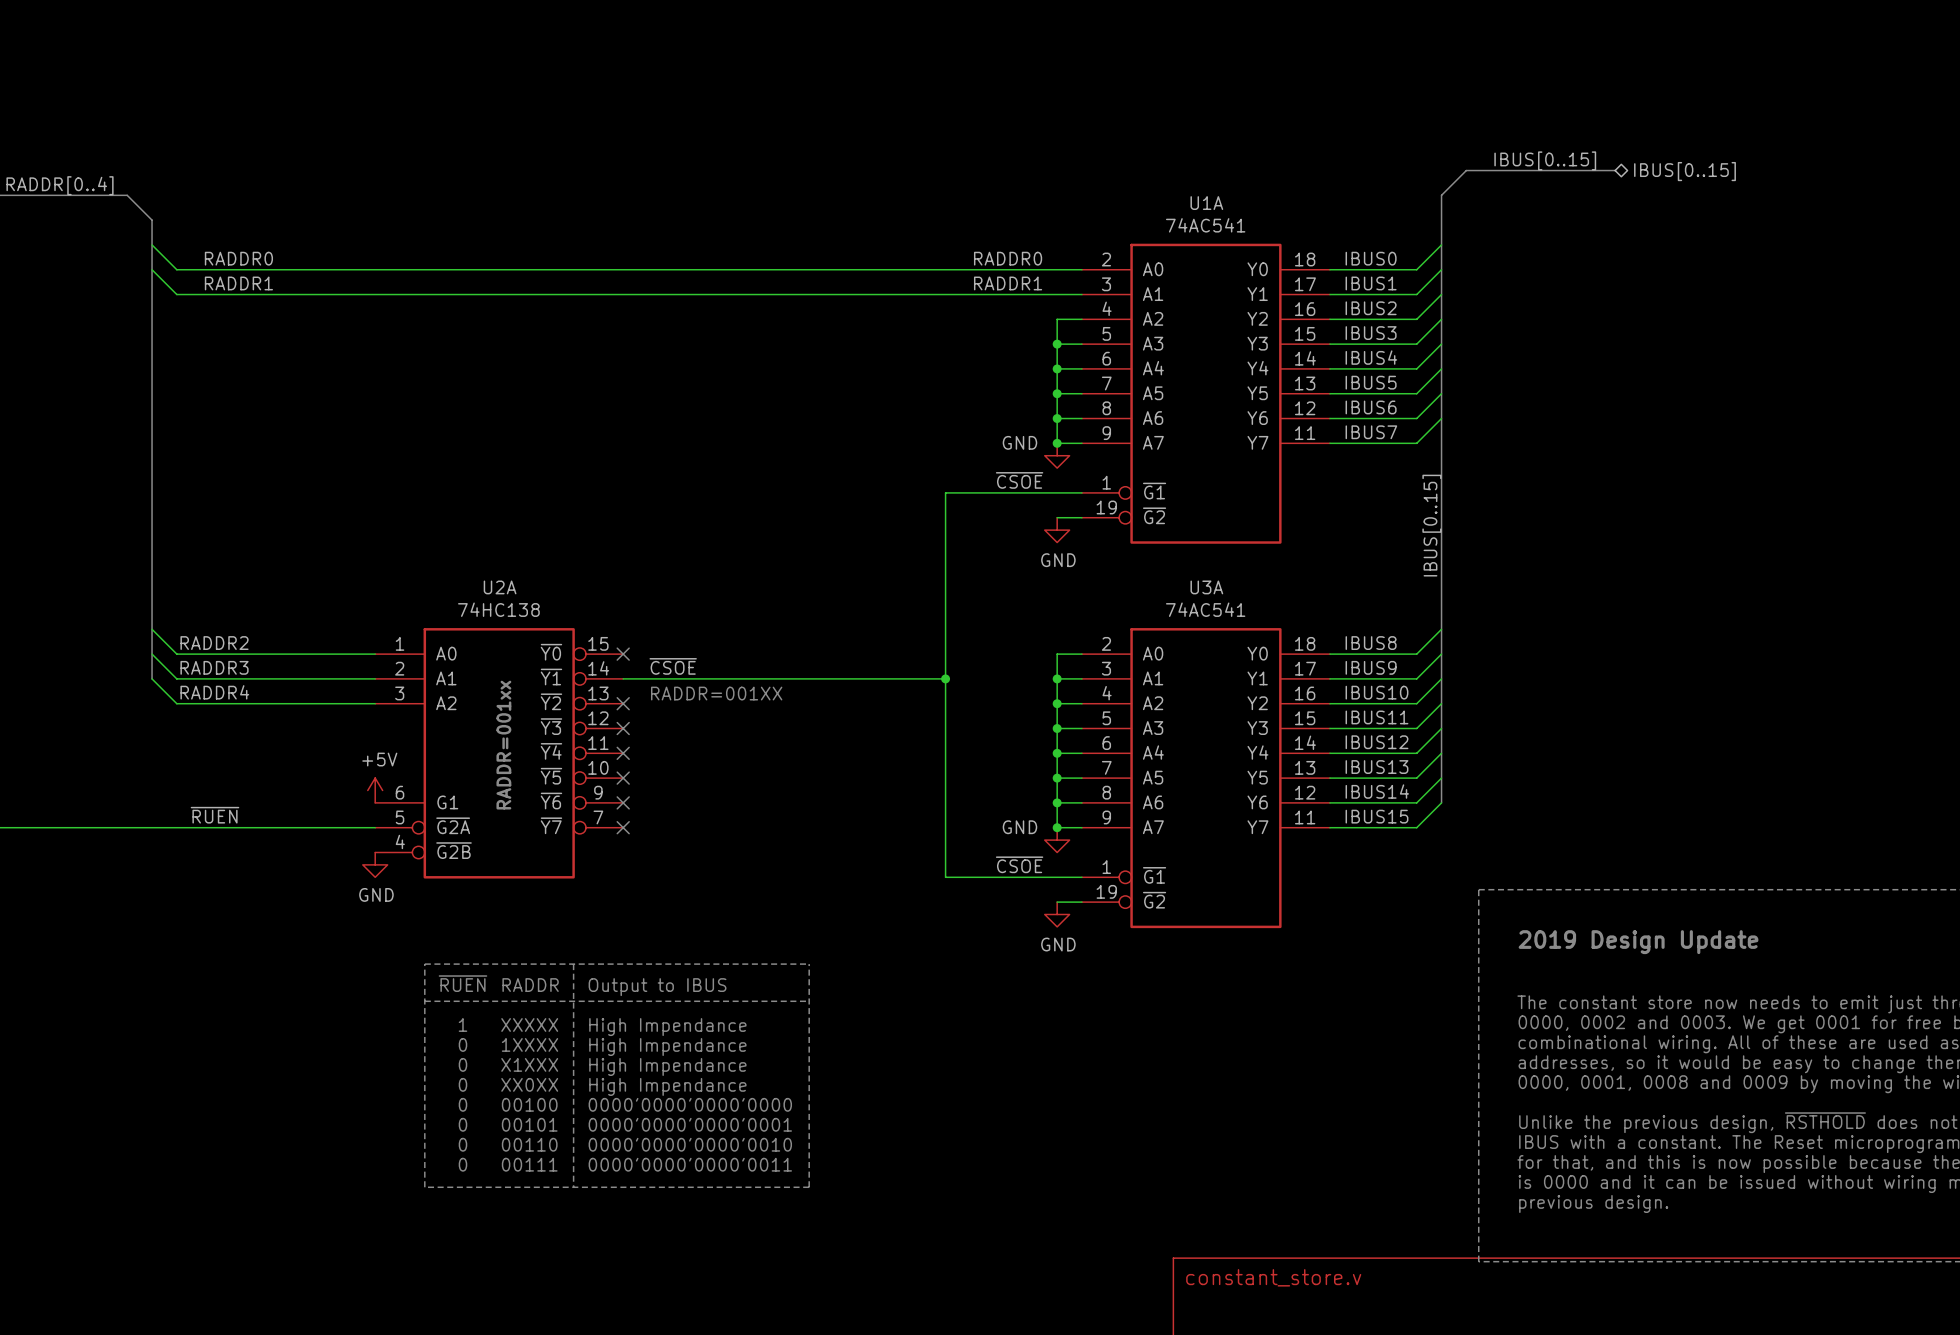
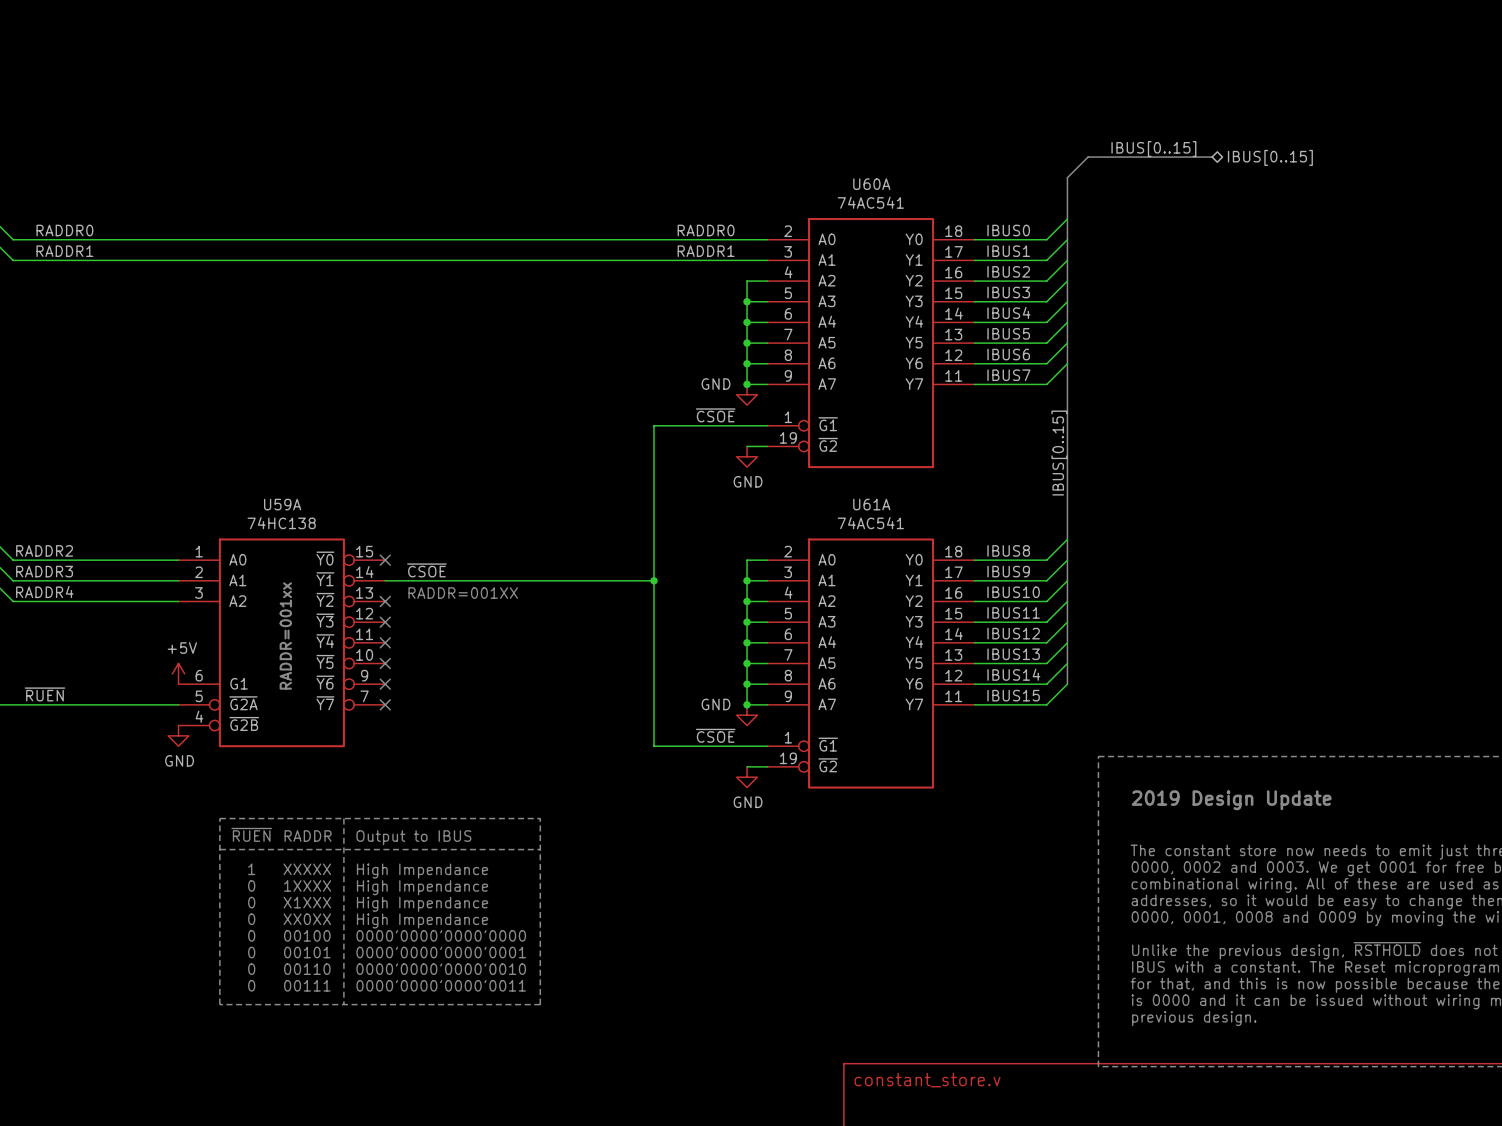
U1A name: U1A (1206, 203) -> U60A (871, 184)
U2A name: U2A (500, 587) -> U59A (282, 504)
U3A name: U3A (1206, 587) -> U61A (871, 504)

